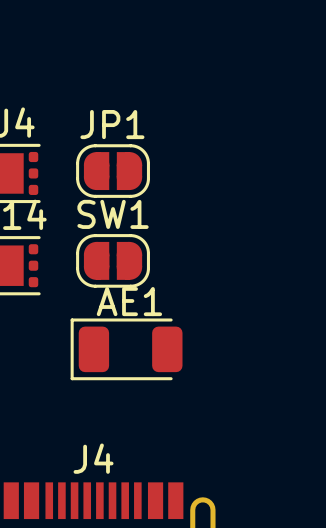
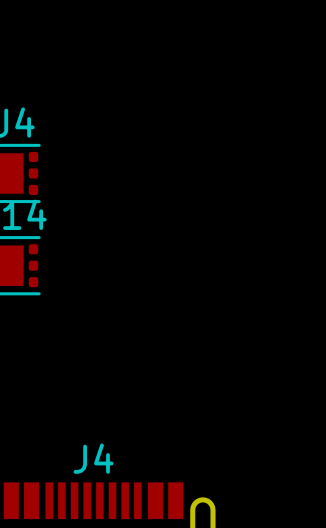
JP1: (113, 171) -> none
SW1: (113, 260) -> none
AE1: (126, 349) -> none

